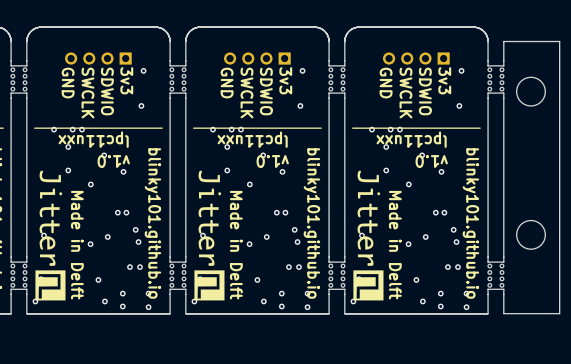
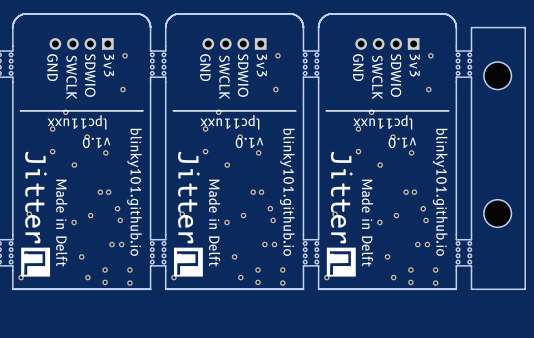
via: (54, 129) -> none
via: (72, 129) -> none
via: (213, 129) -> none
via: (231, 129) -> none
via: (372, 129) -> none
via: (390, 129) -> none

